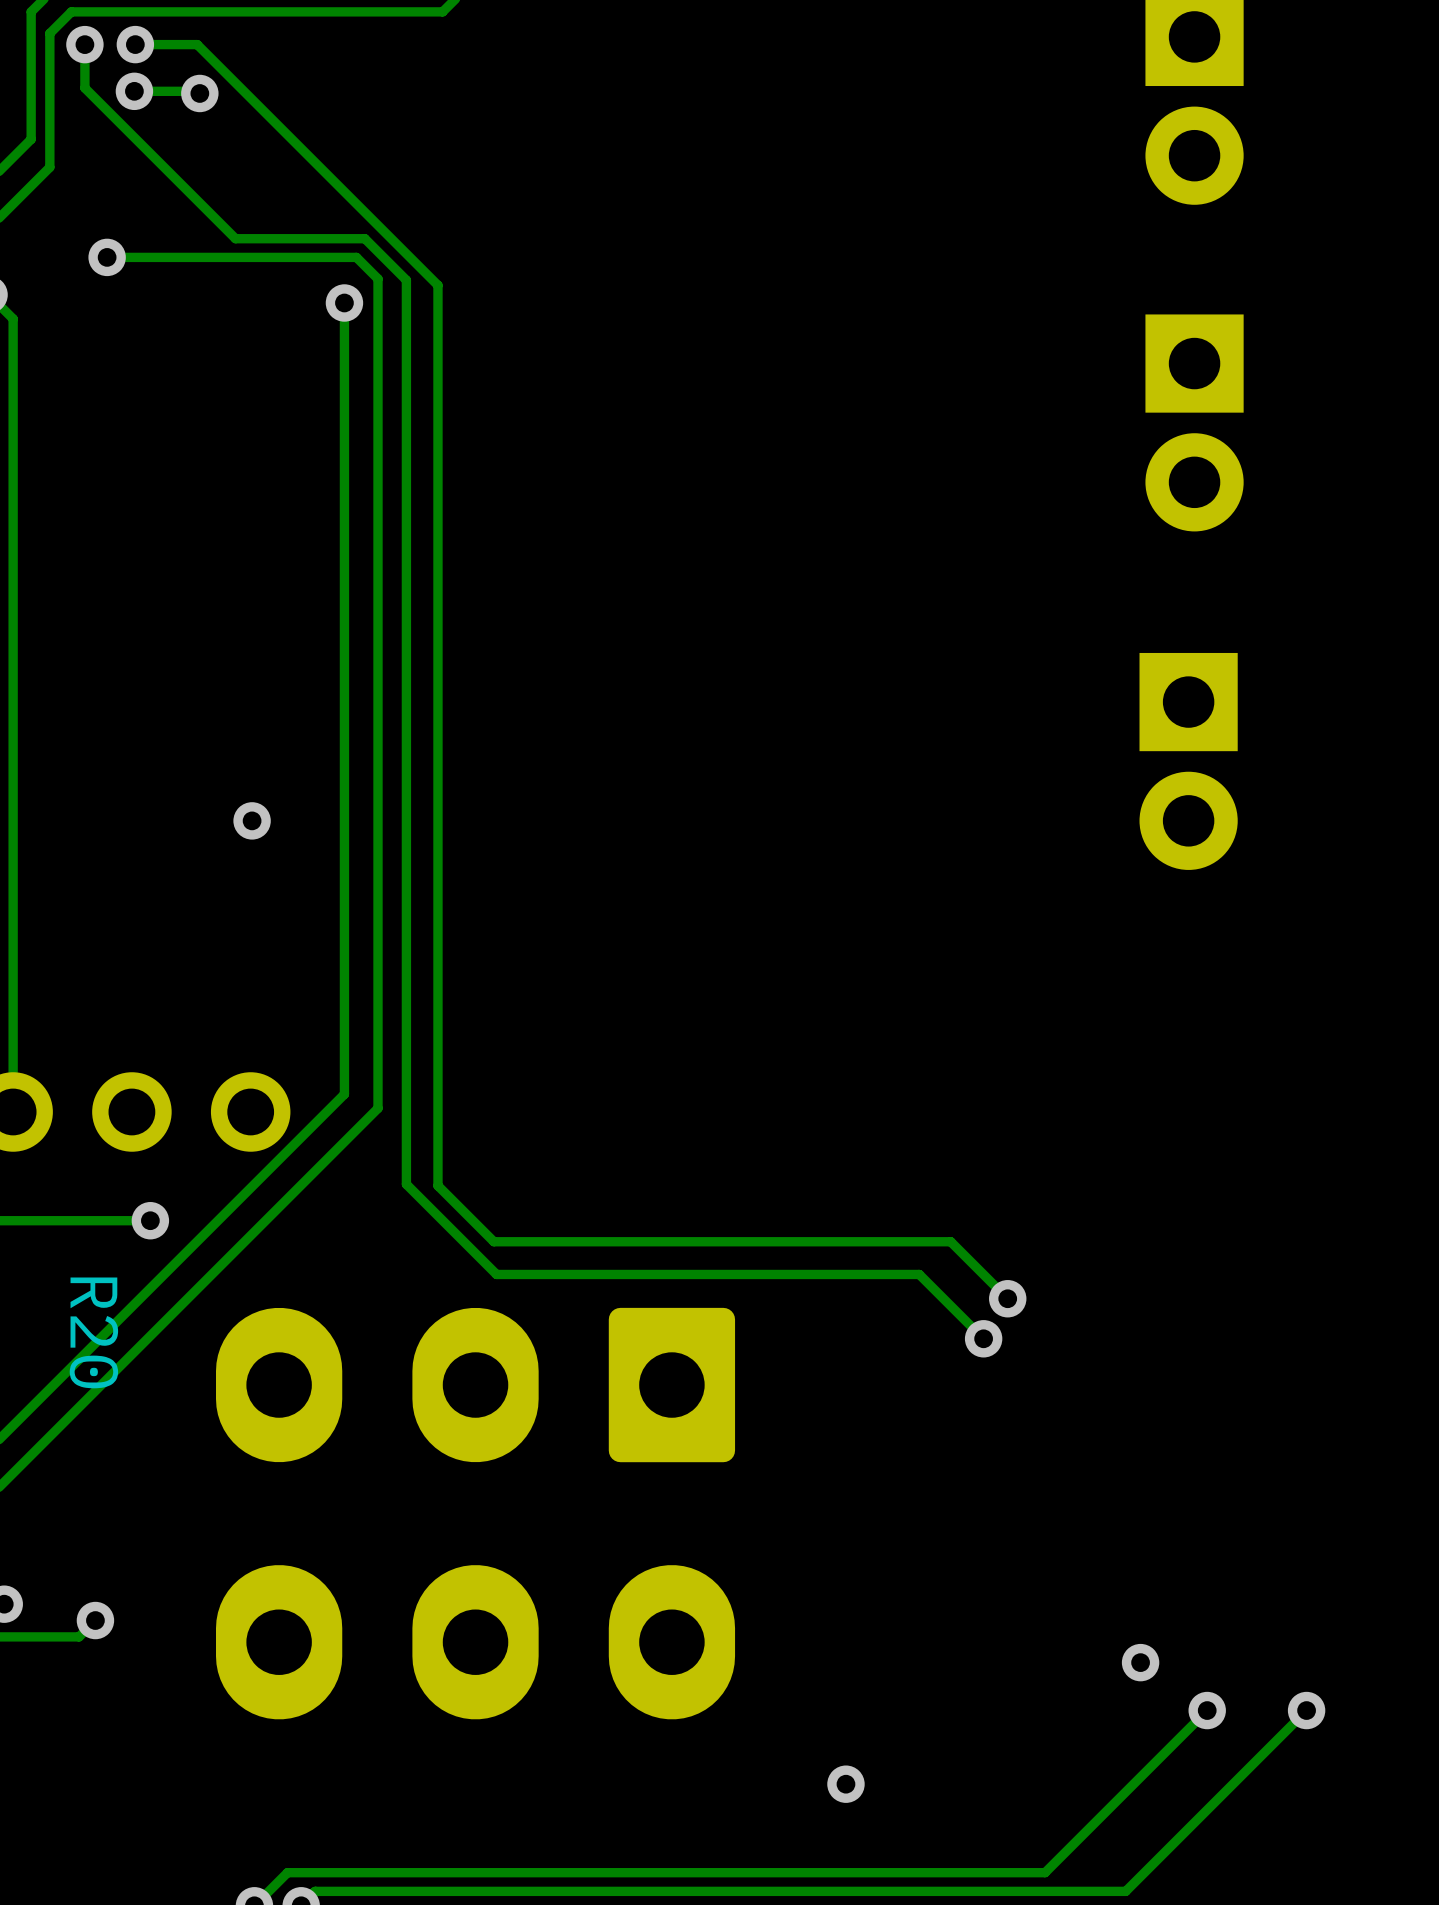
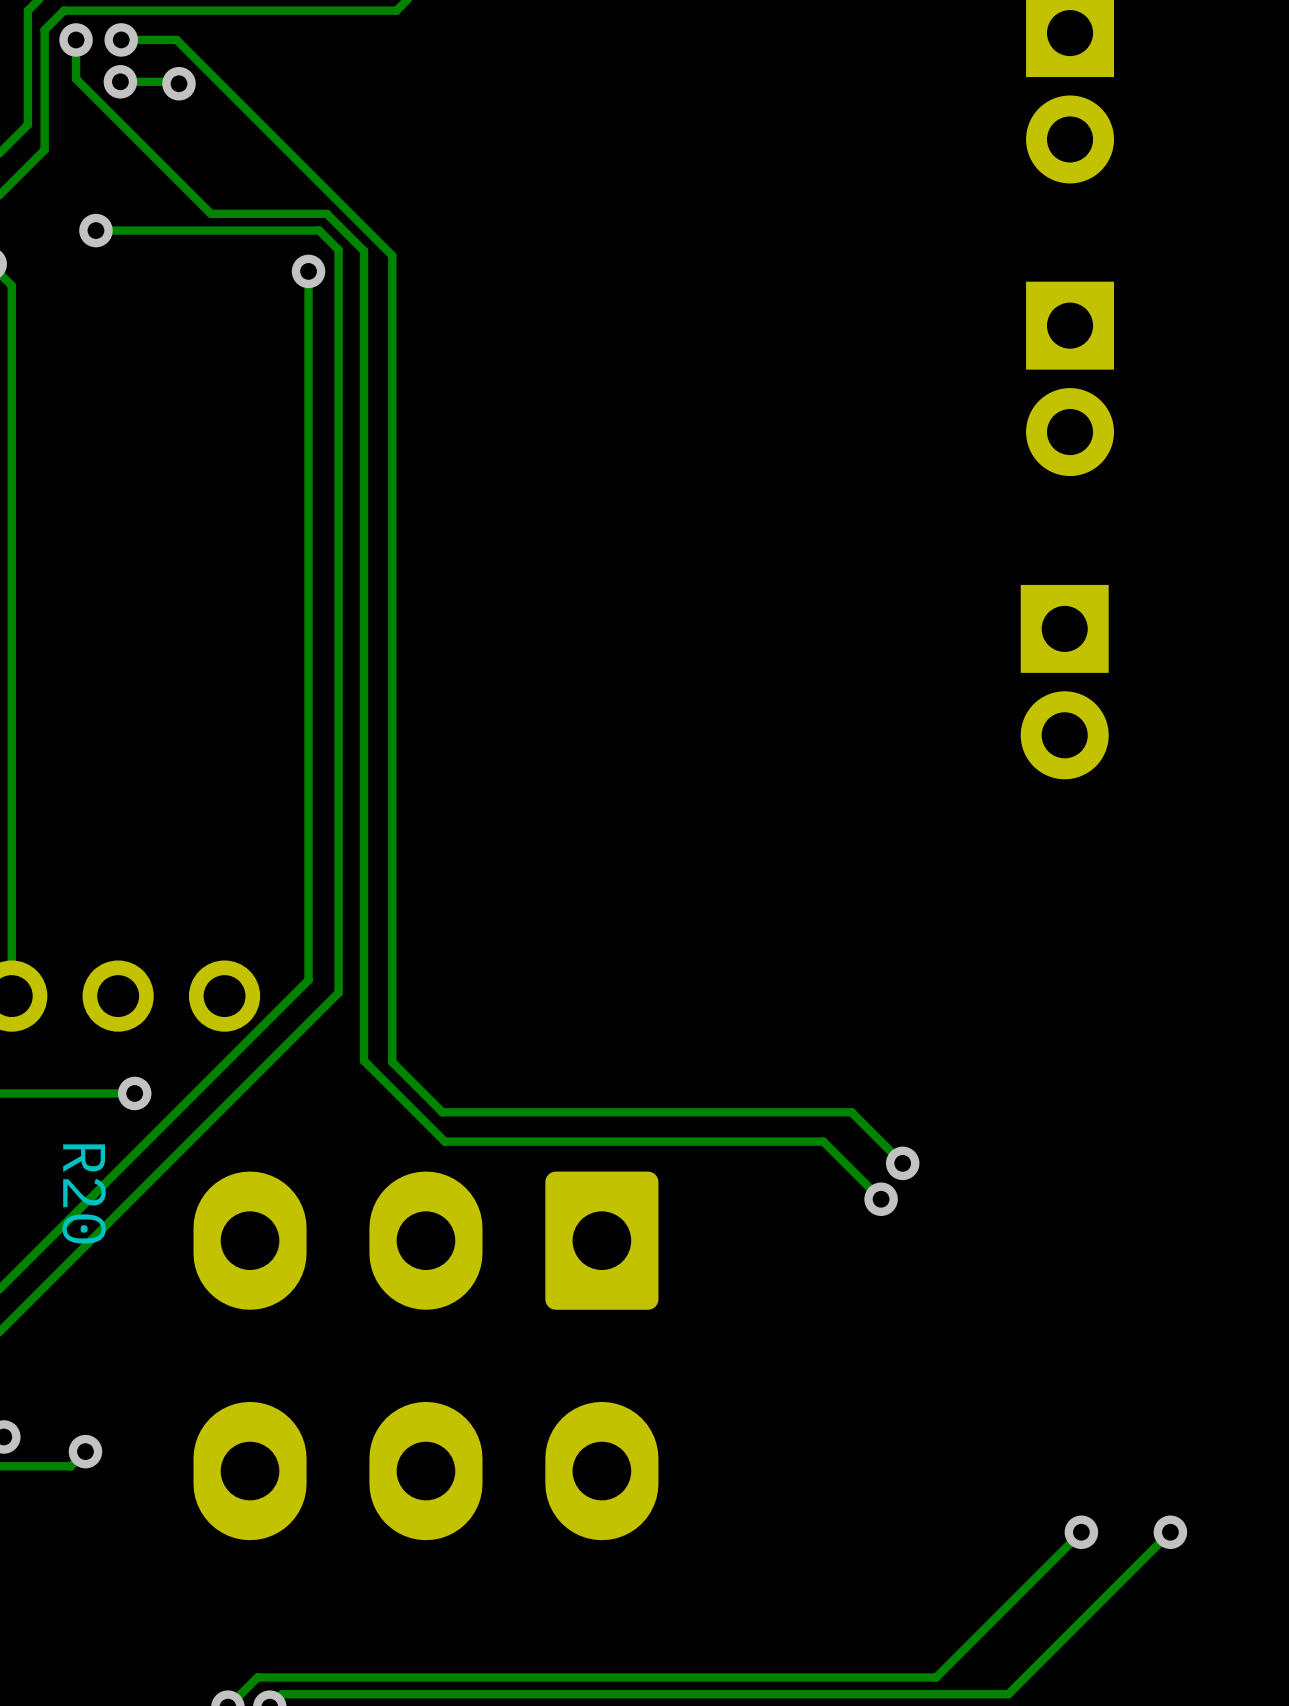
via: (252, 820) -> none
via: (1140, 1662) -> none
via: (845, 1784) -> none

